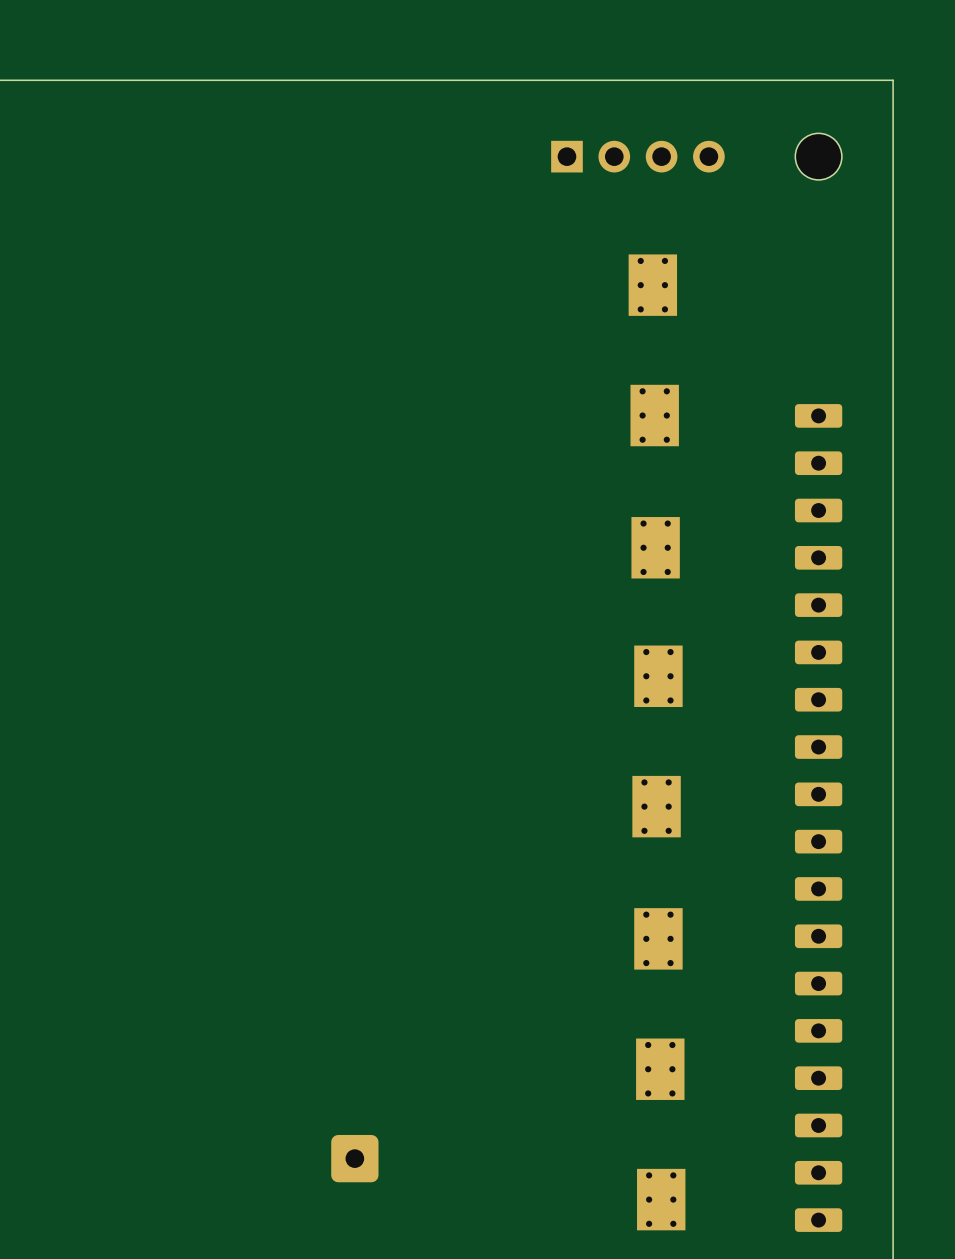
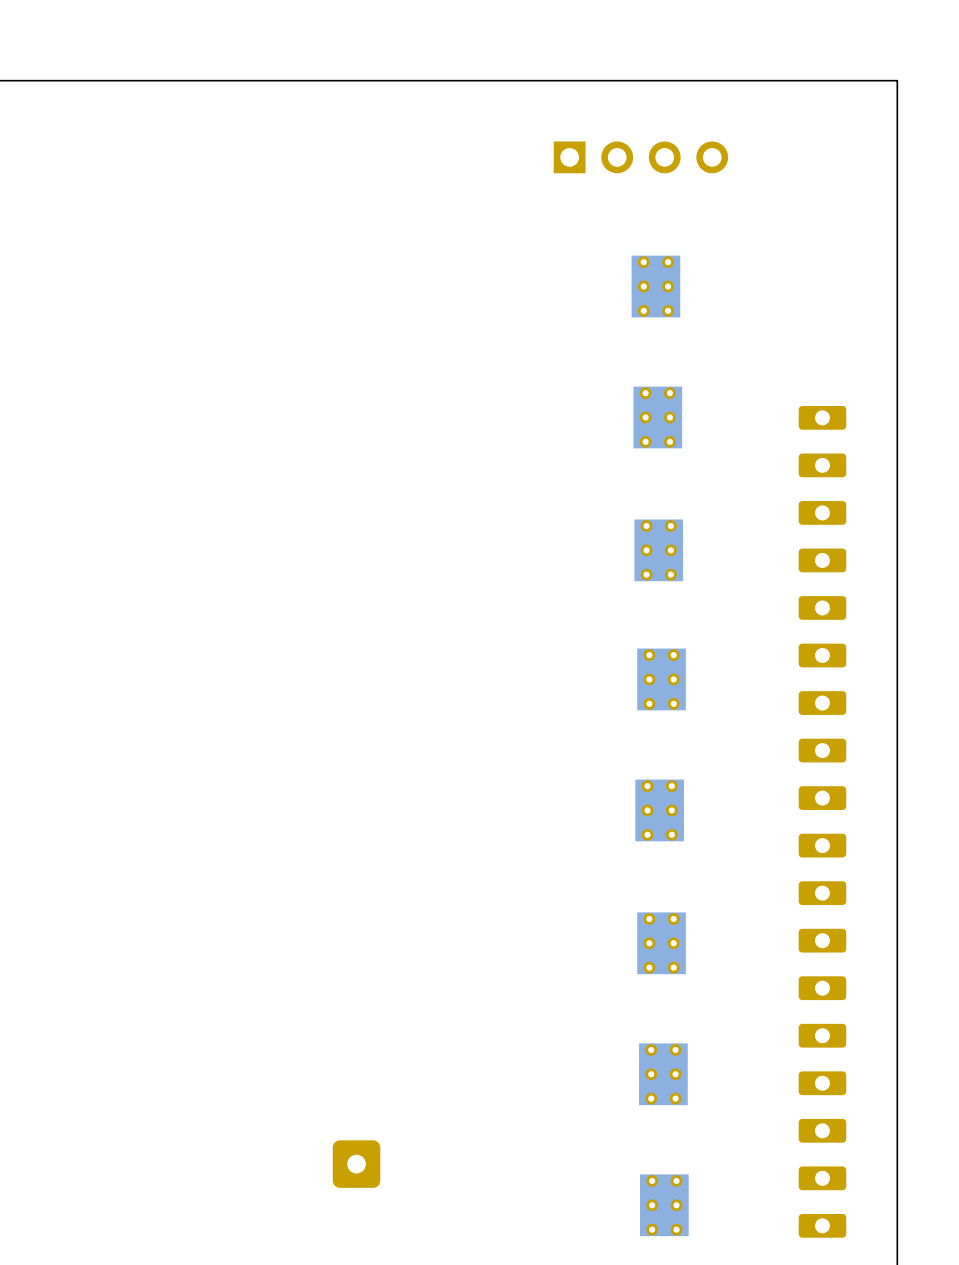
part: (818, 156) -> none

